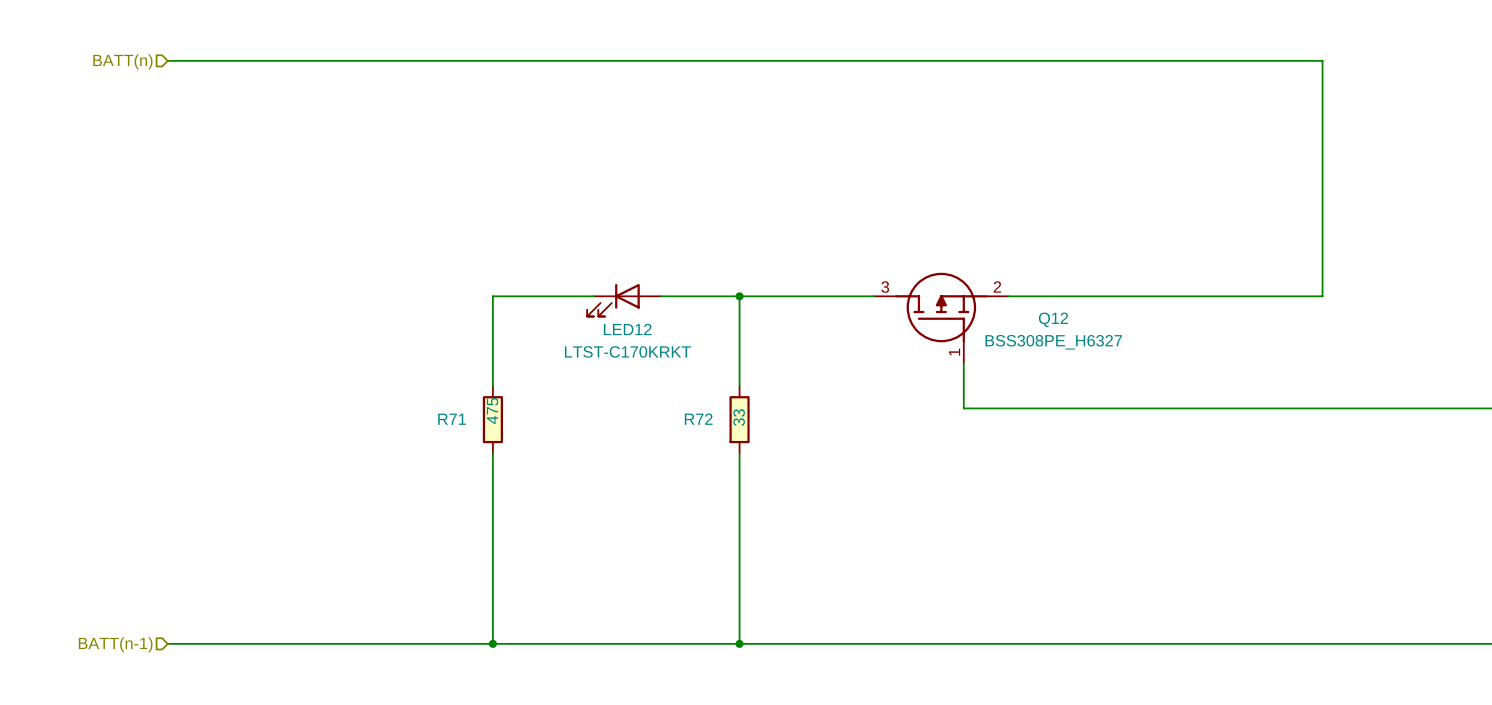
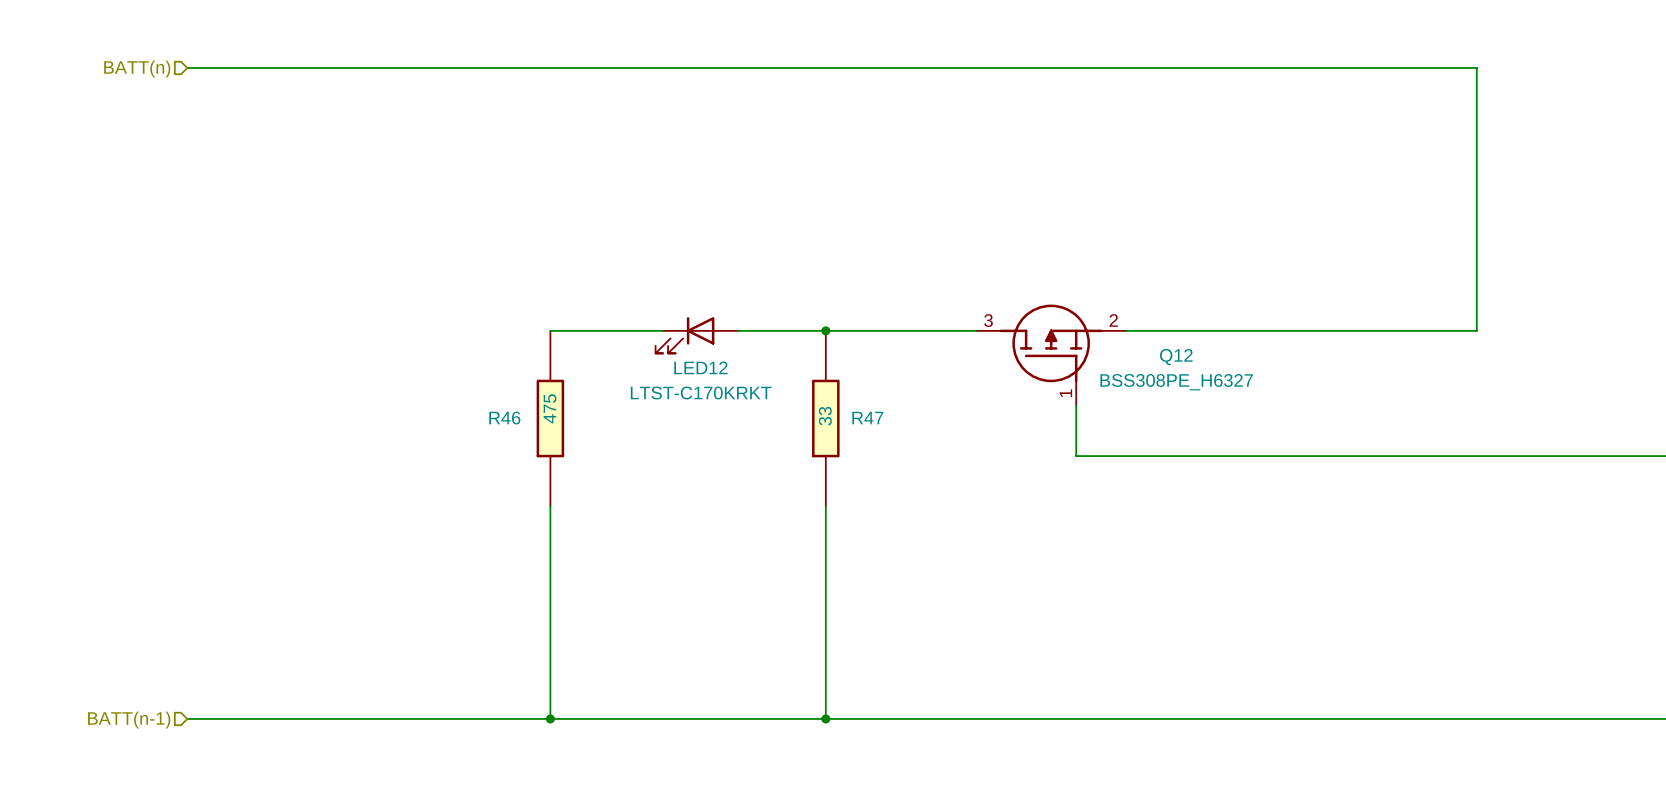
R46: none -> 475 (550, 418)
R47: none -> 33 (825, 418)
R71: 475 (492, 419) -> none
R72: 33 (739, 419) -> none

